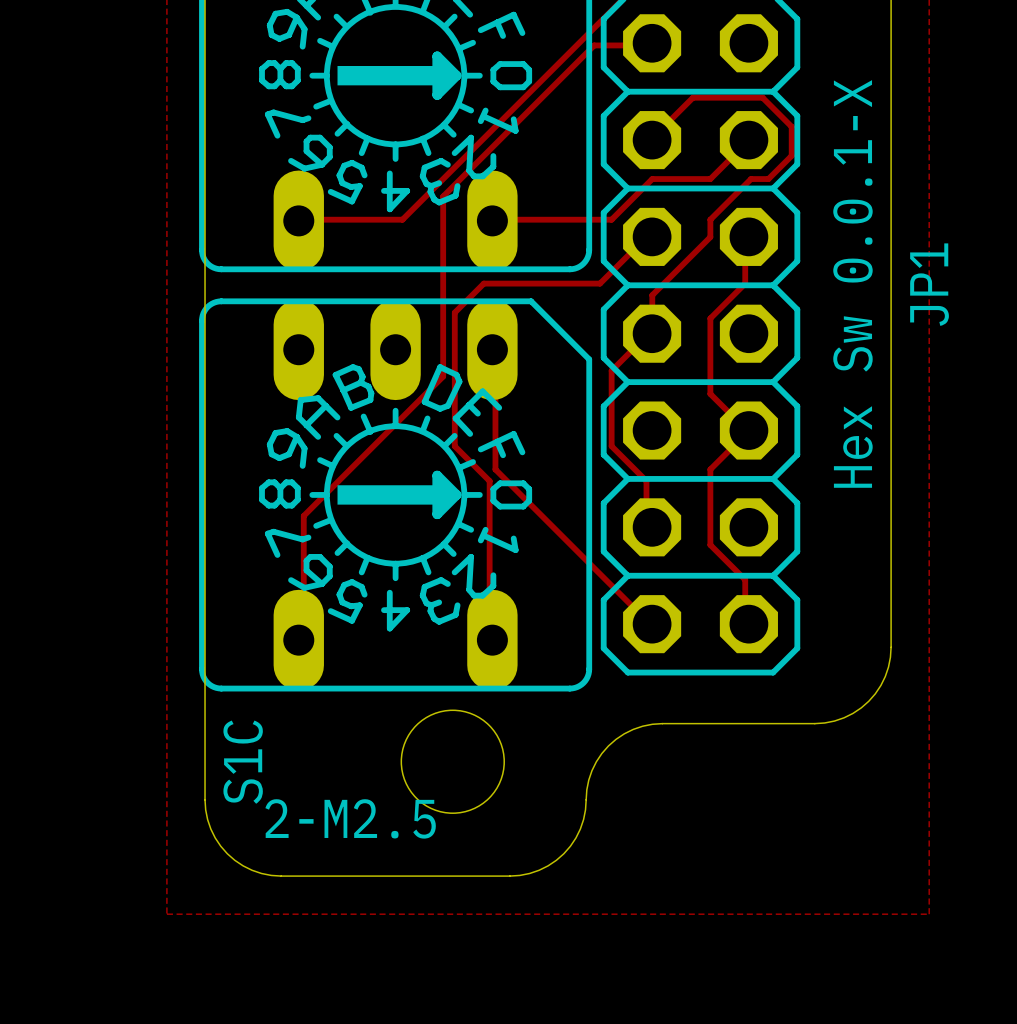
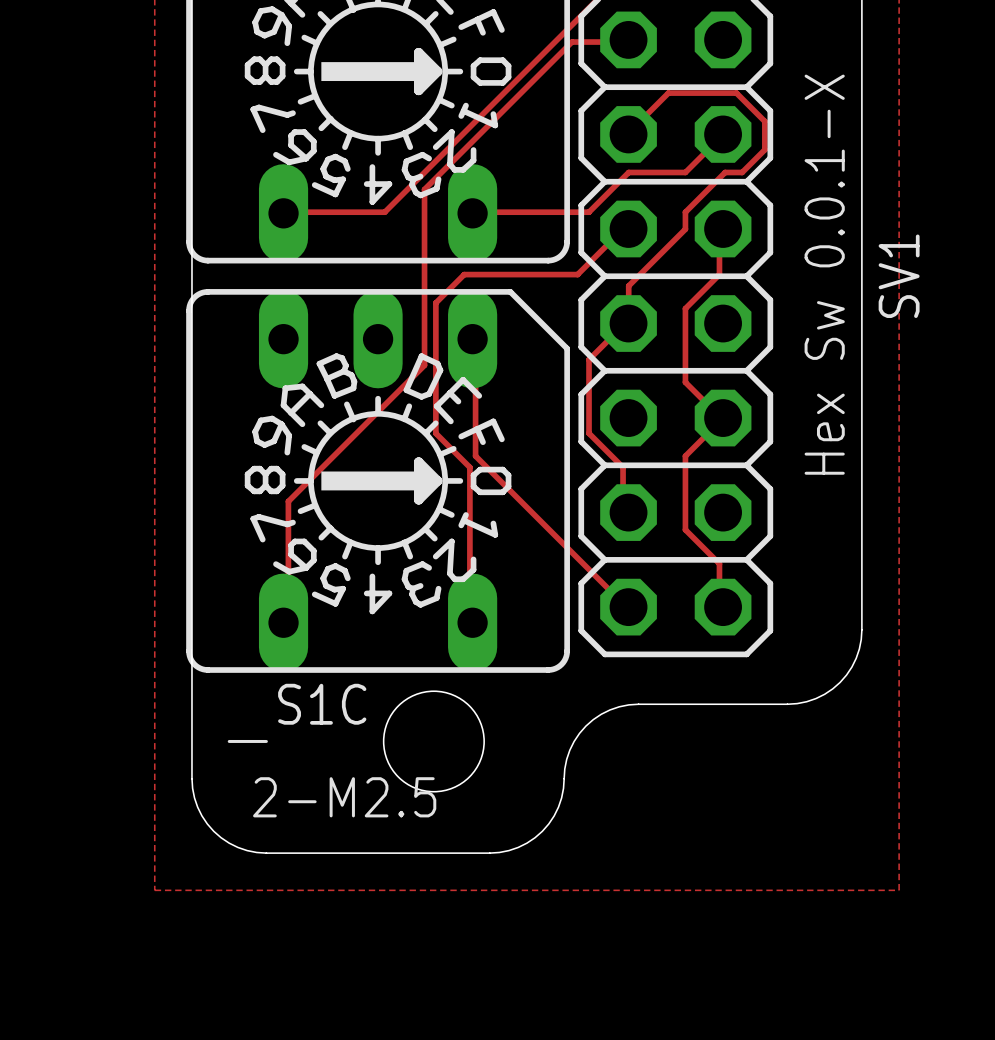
JP1 name: JP1 (929, 284) -> SV1 (899, 276)
text: none -> I (247, 741)
S1C name rotation: 0° (243, 762) -> 90° clockwise (322, 704)

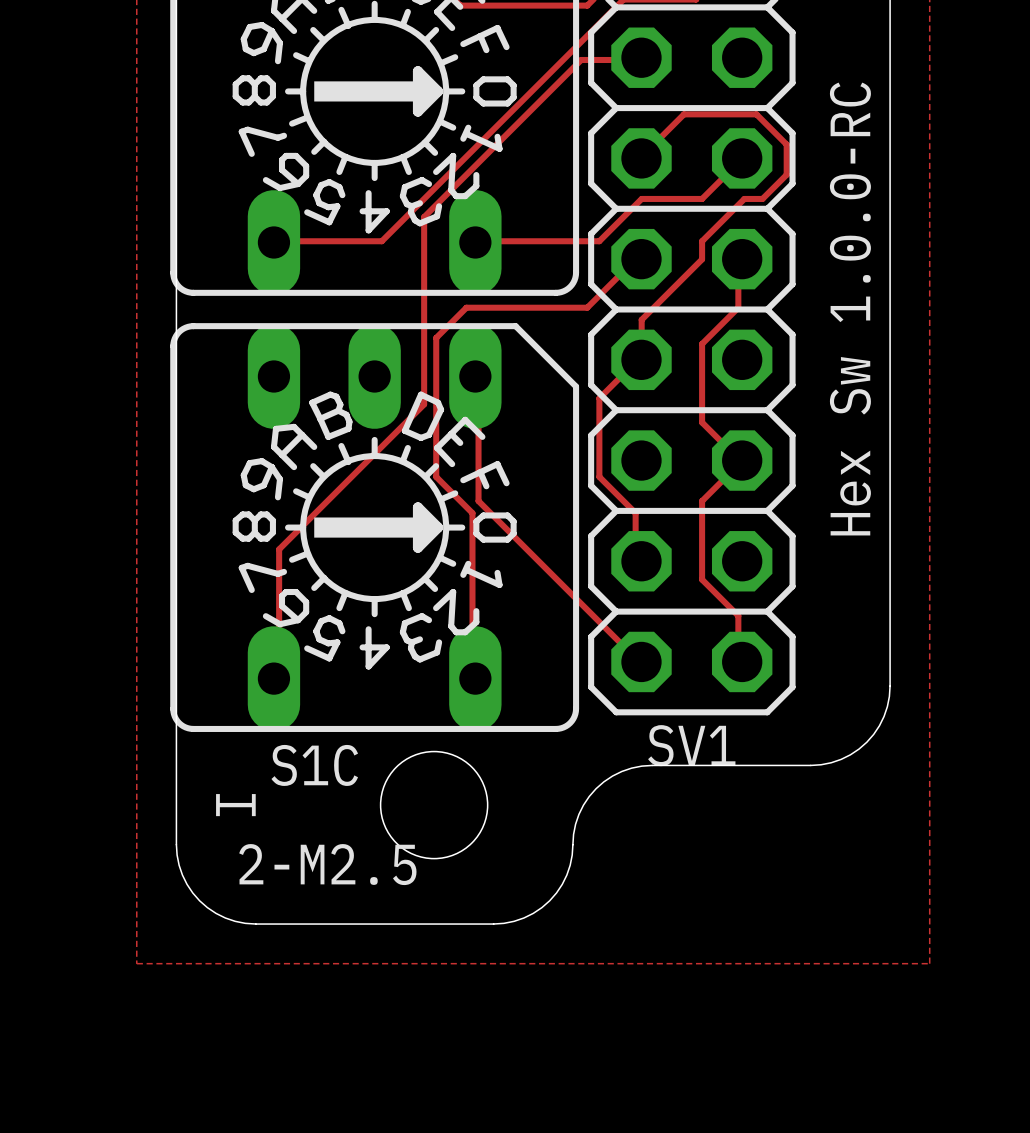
text: Hex Sw 0.0.1-X (824, 274) -> Hex Sw 1.0.0-RC (850, 309)
SV1 name rotation: 0° (899, 276) -> 90° clockwise (691, 745)
SV1 name position: SV1 (899, 276) -> SV1 (691, 745)

